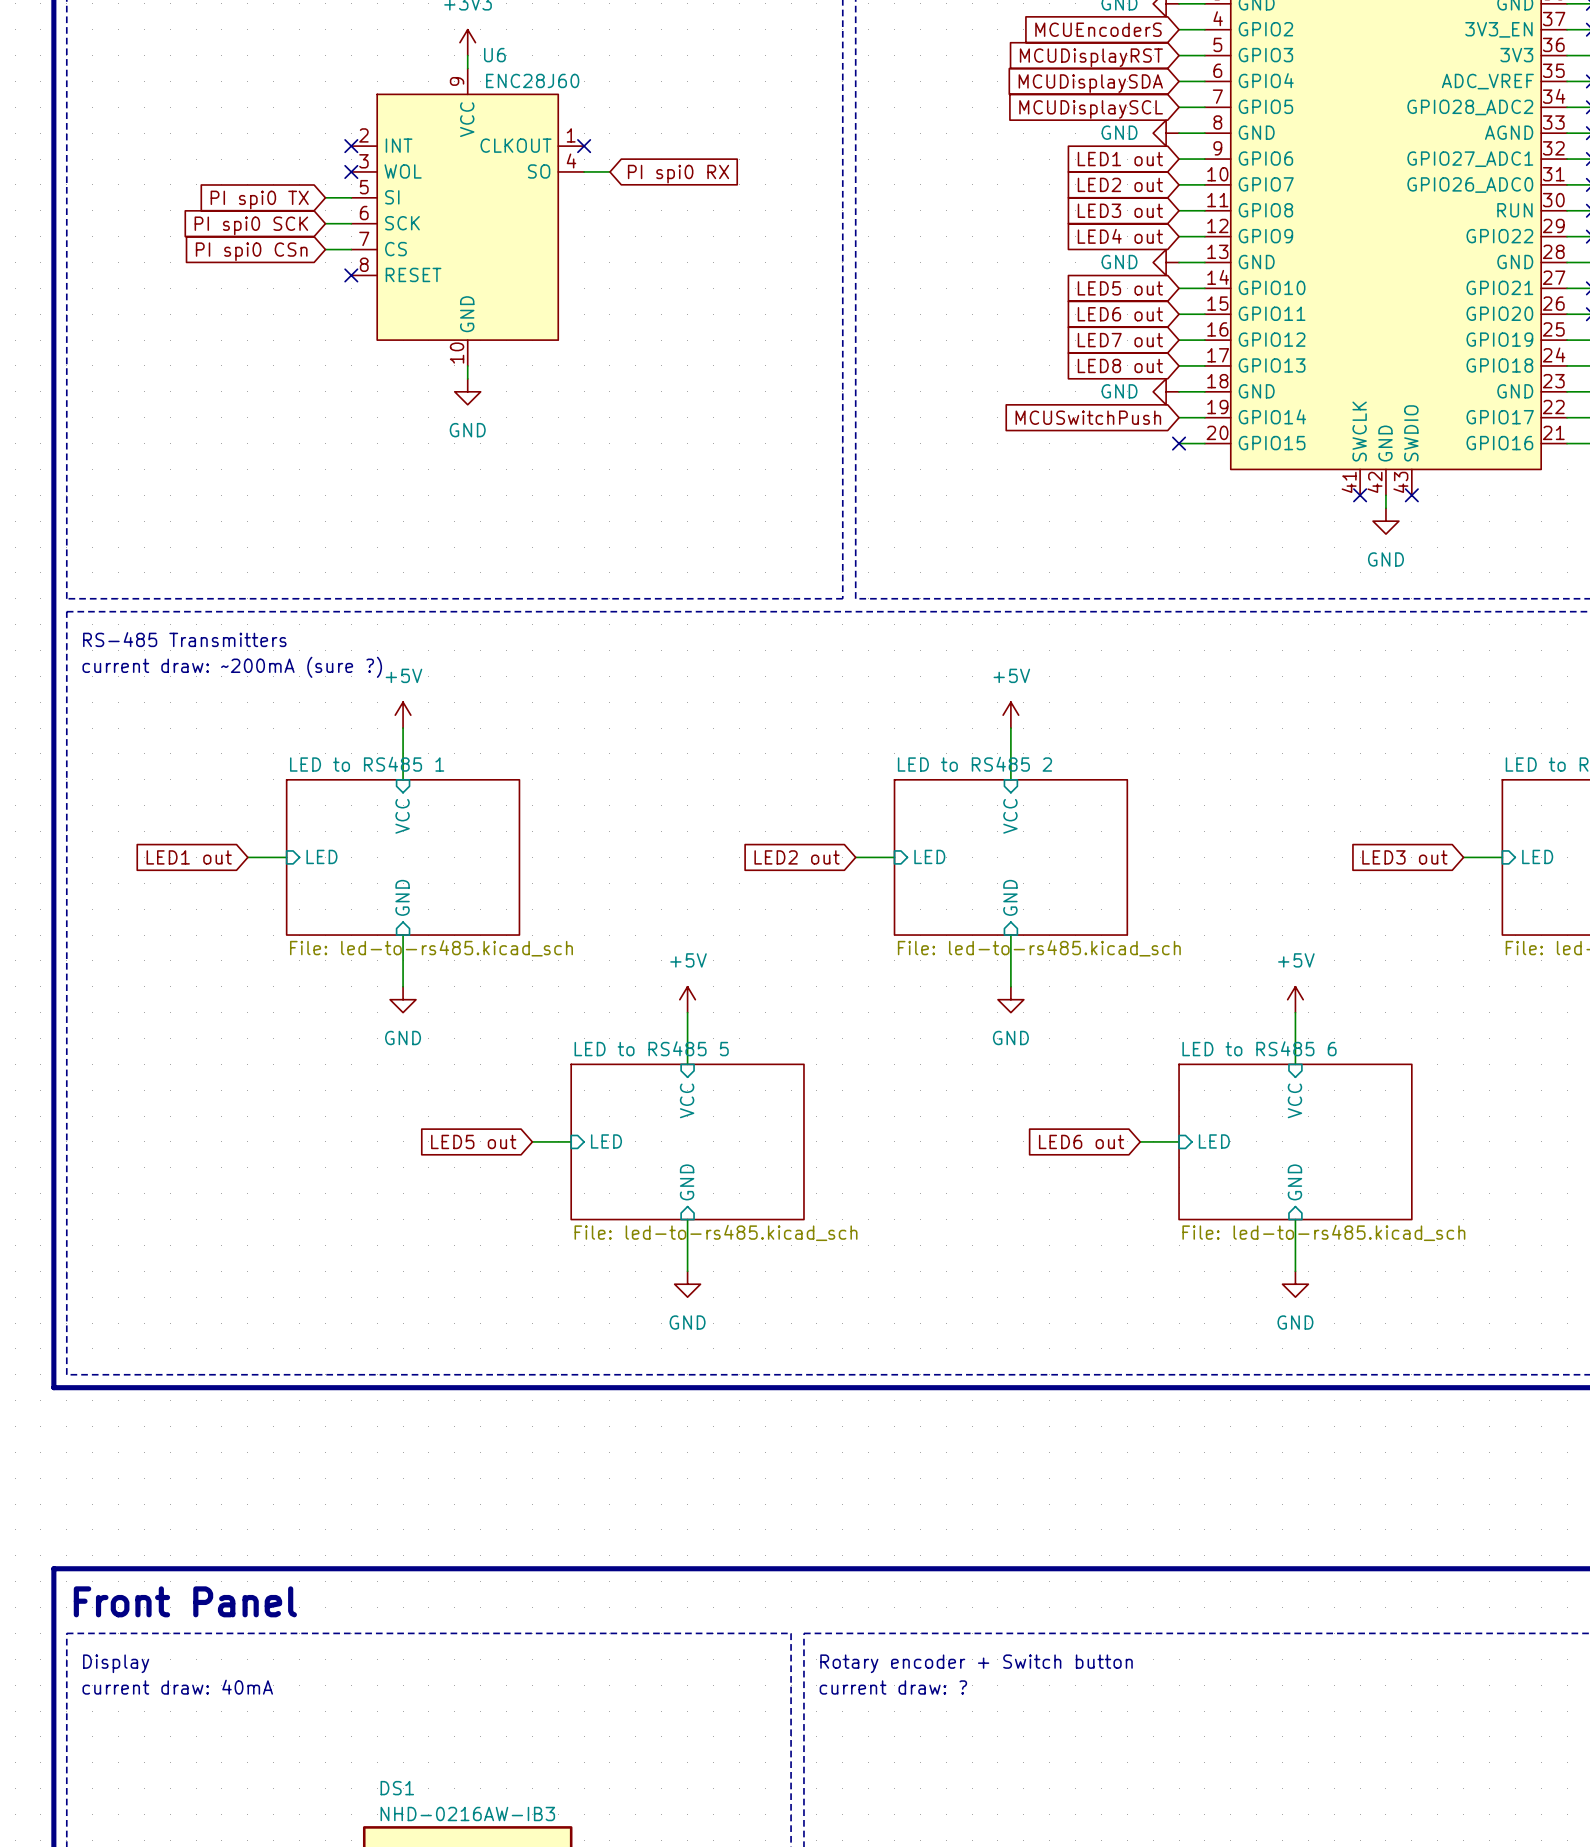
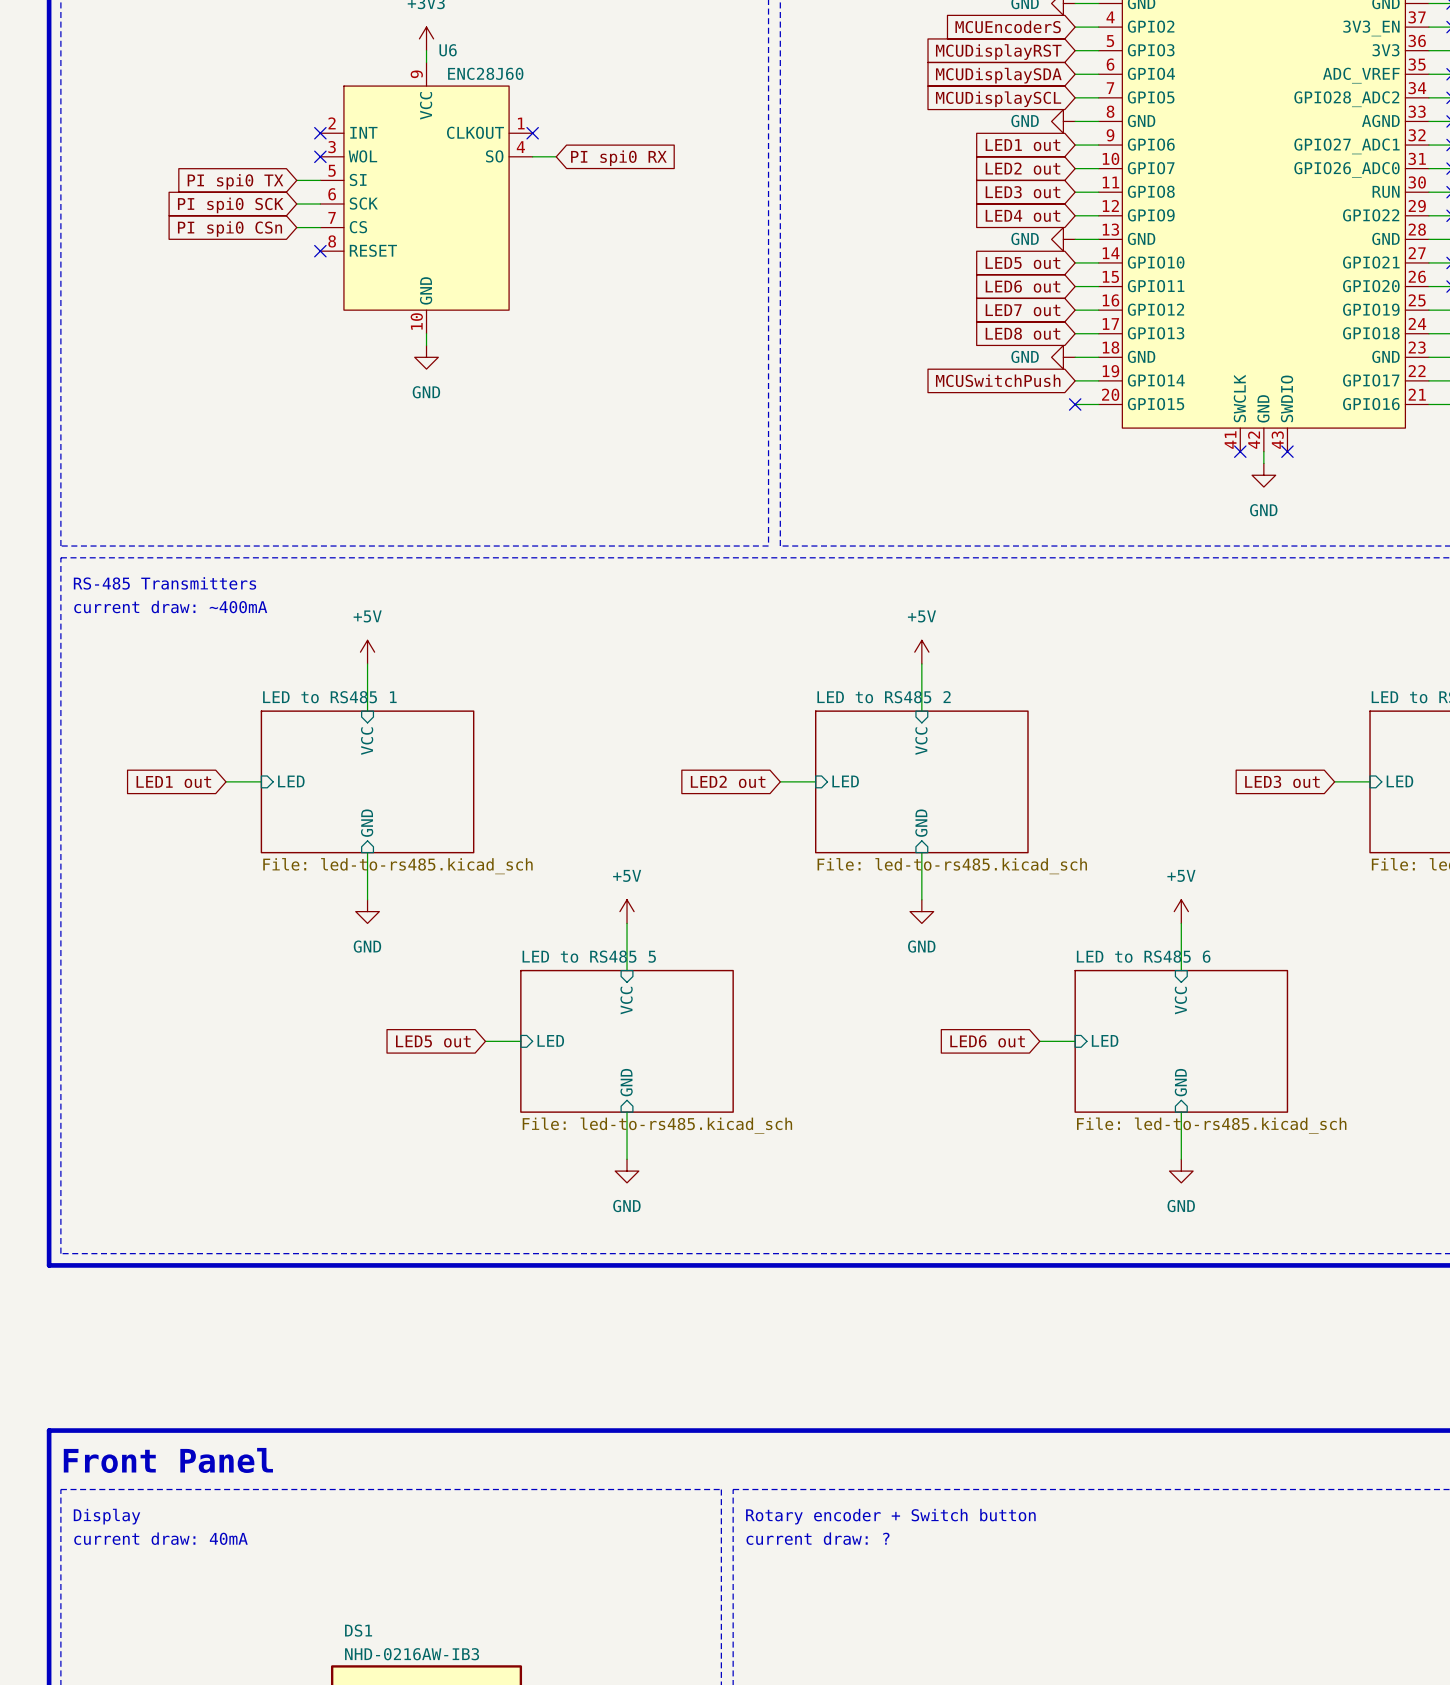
text: current draw: ~200mA (sure ?) (232, 667) -> current draw: ~400mA (170, 606)

